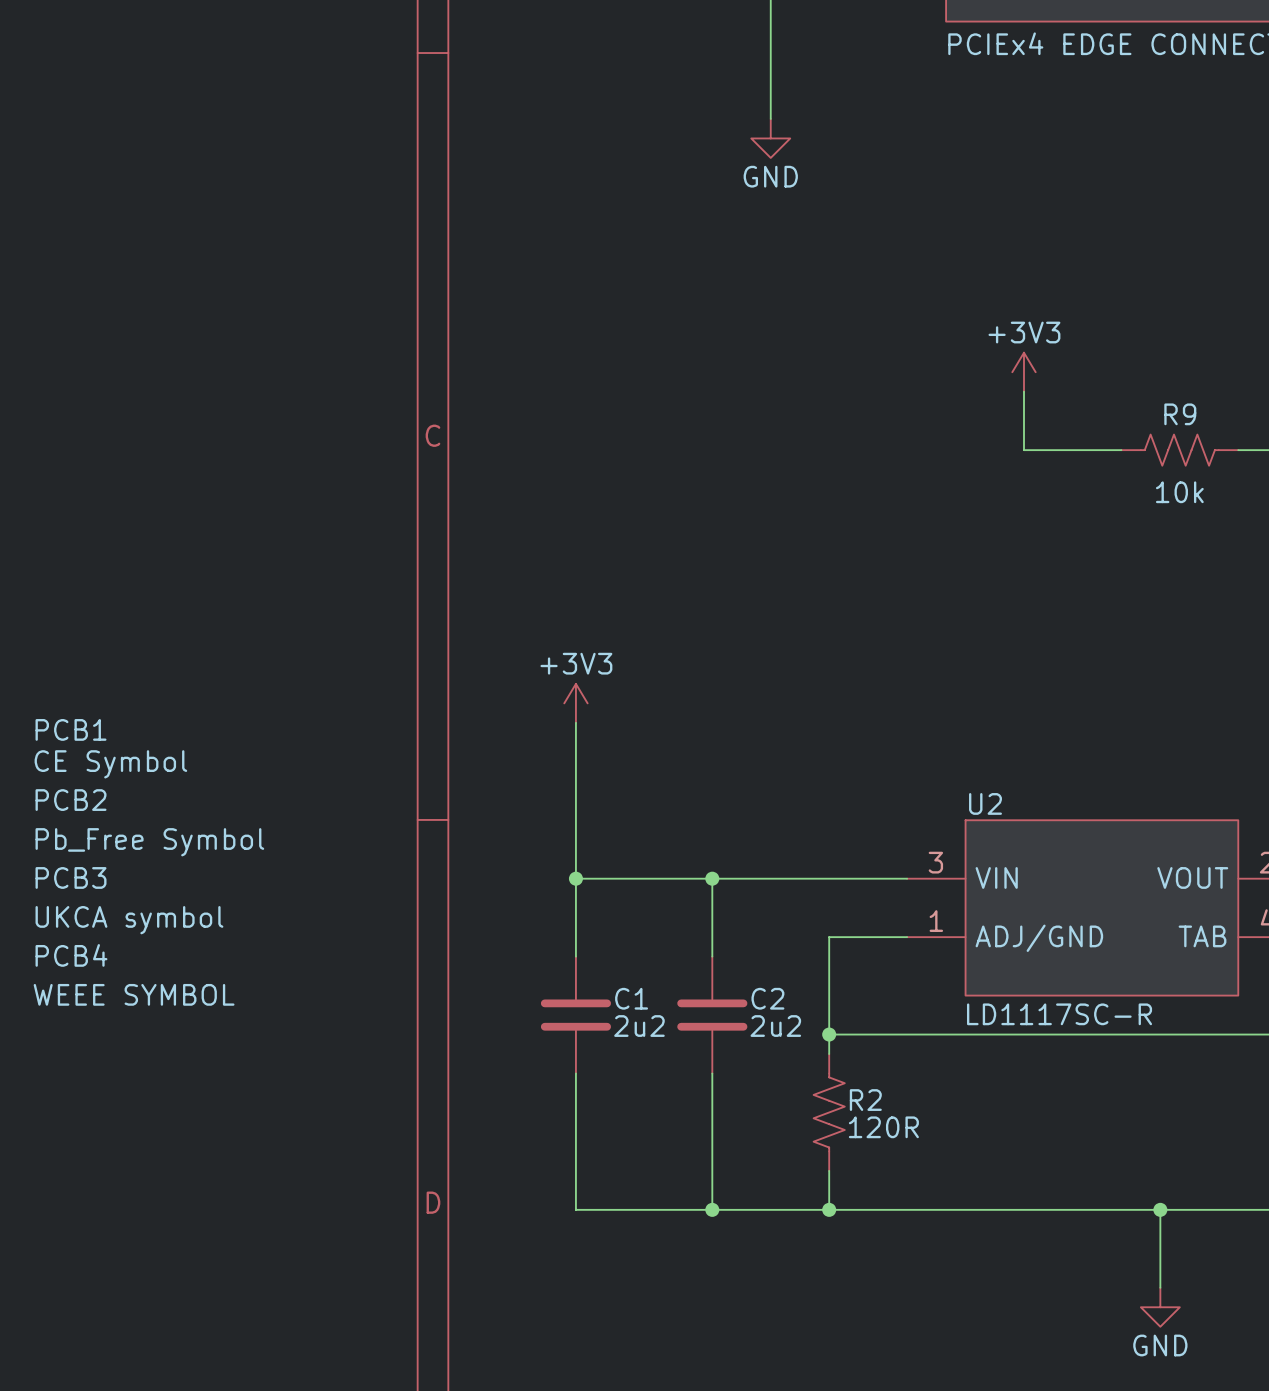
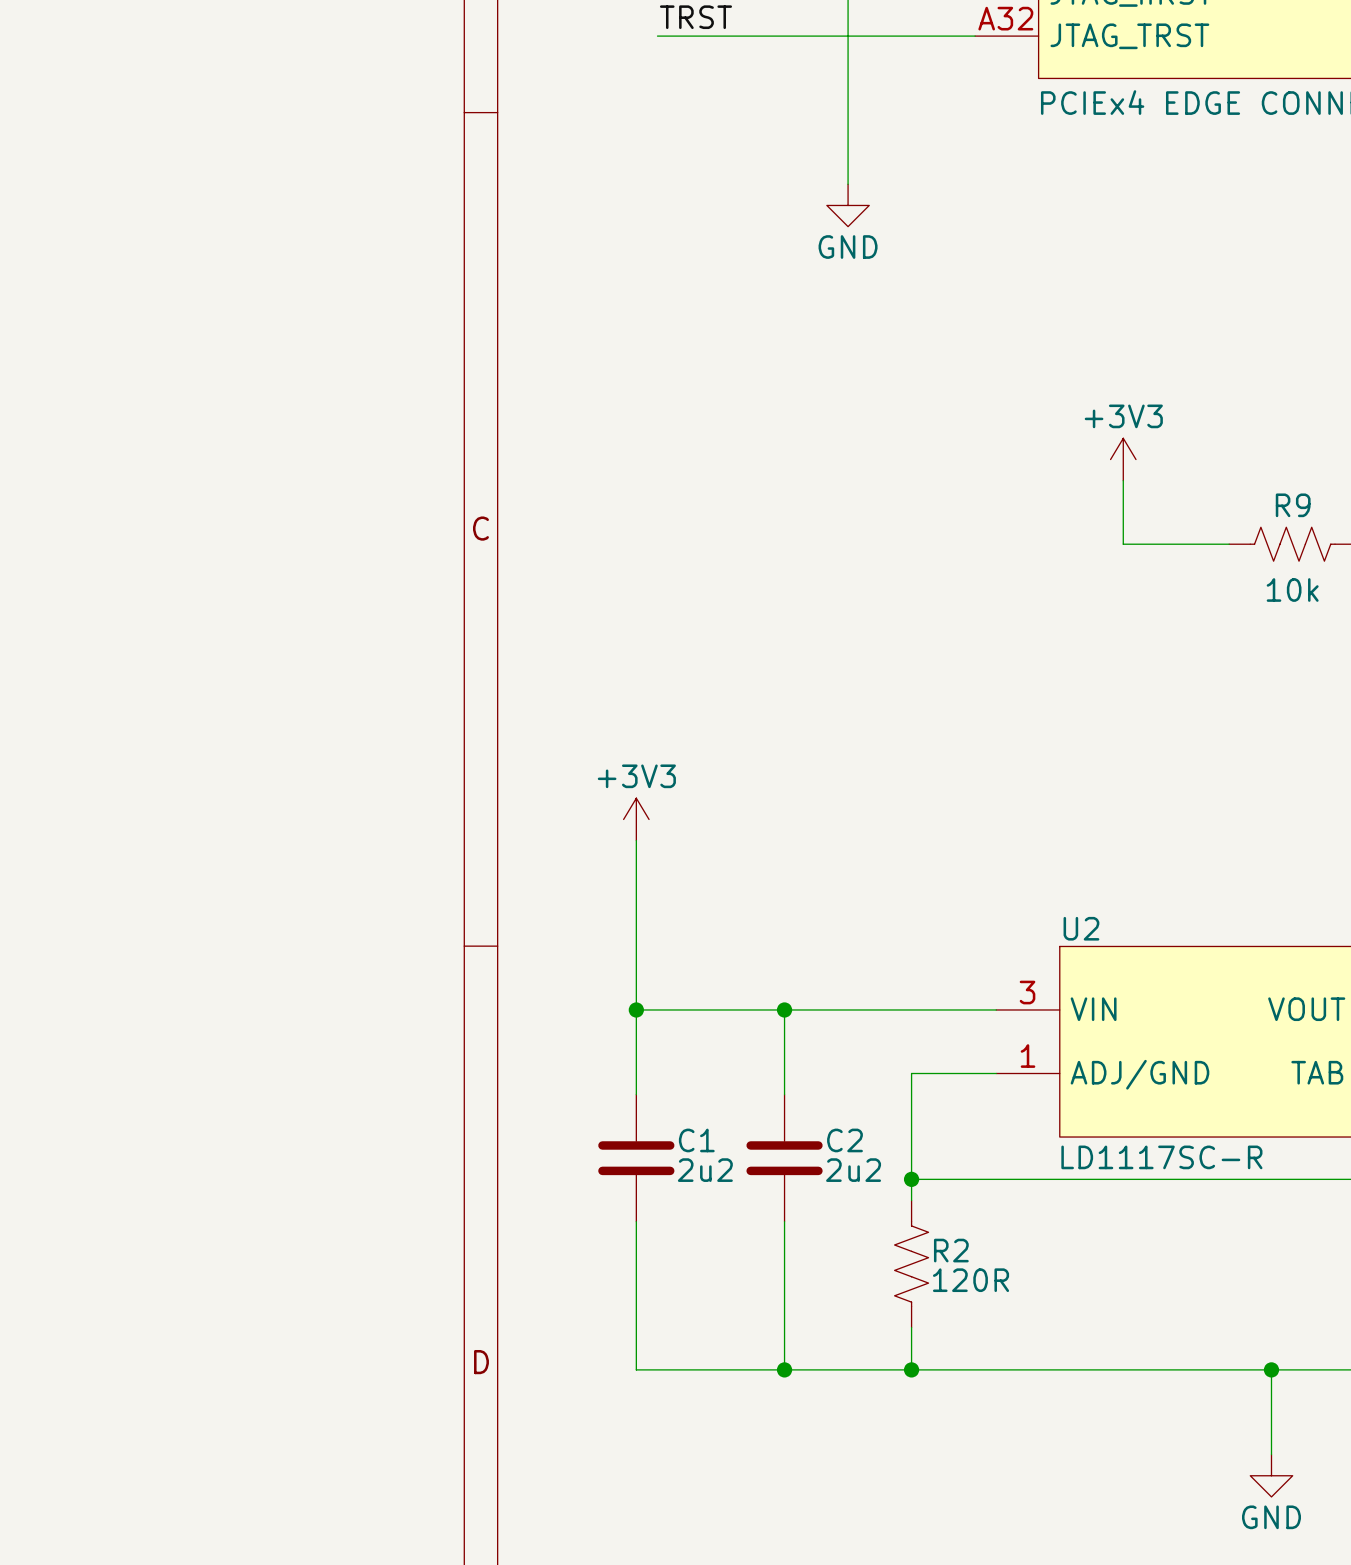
PCB1: CE Symbol (110, 748) -> none
PCB2: Pb_Free Symbol (149, 822) -> none
PCB3: UKCA symbol (129, 900) -> none
PCB4: WEEE SYMBOL (134, 974) -> none

